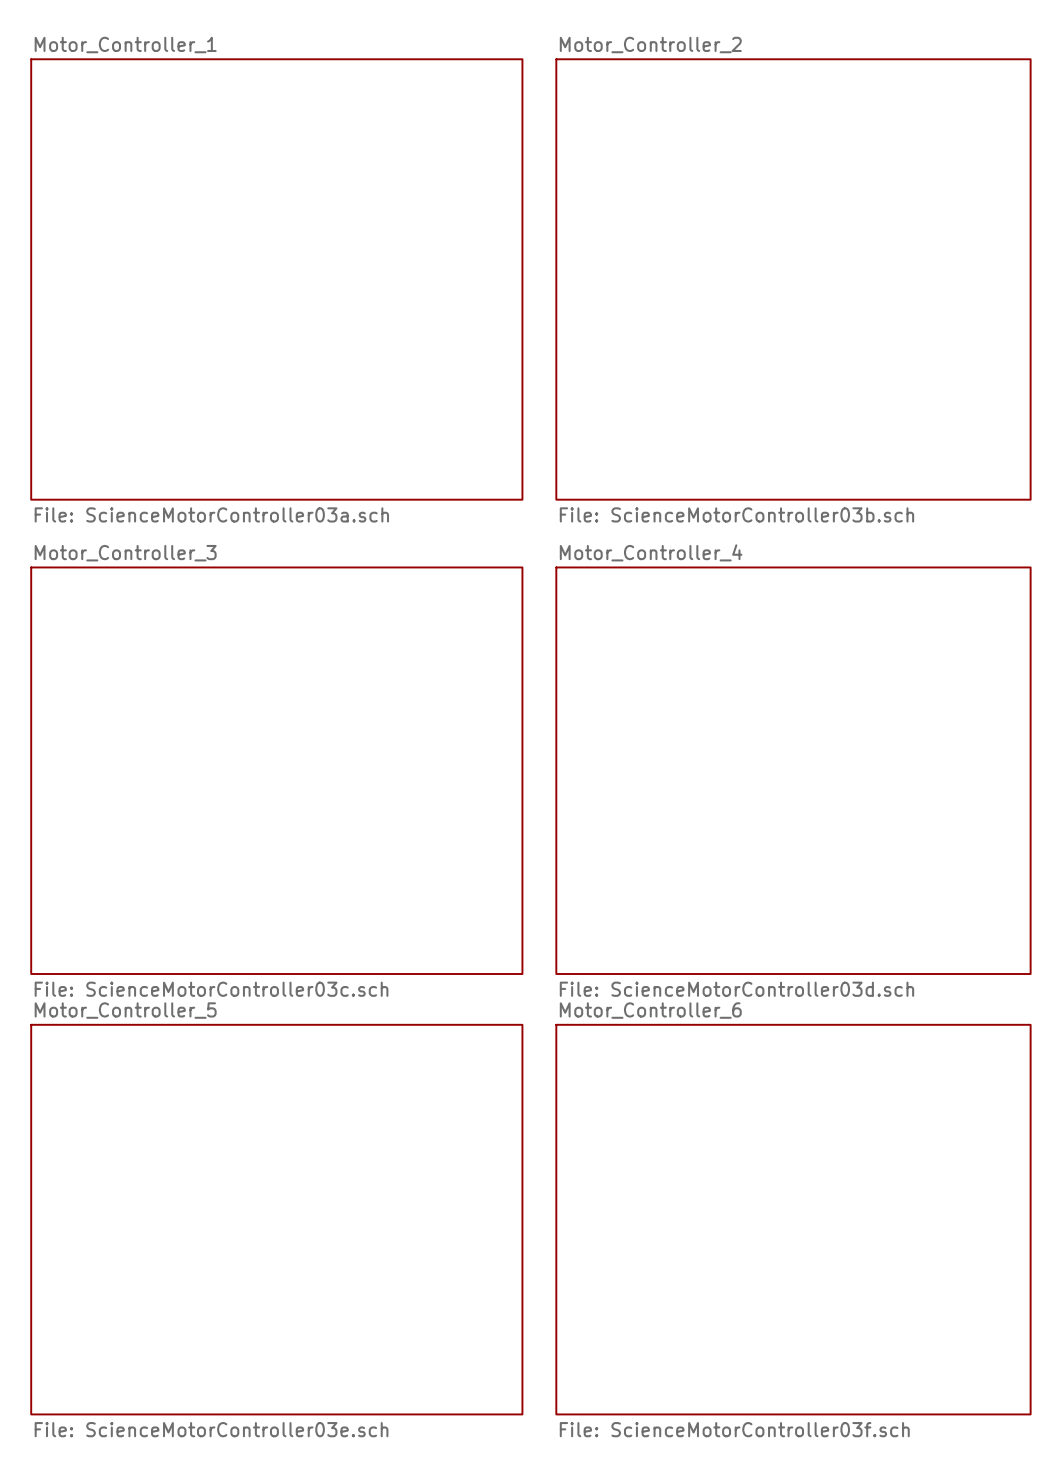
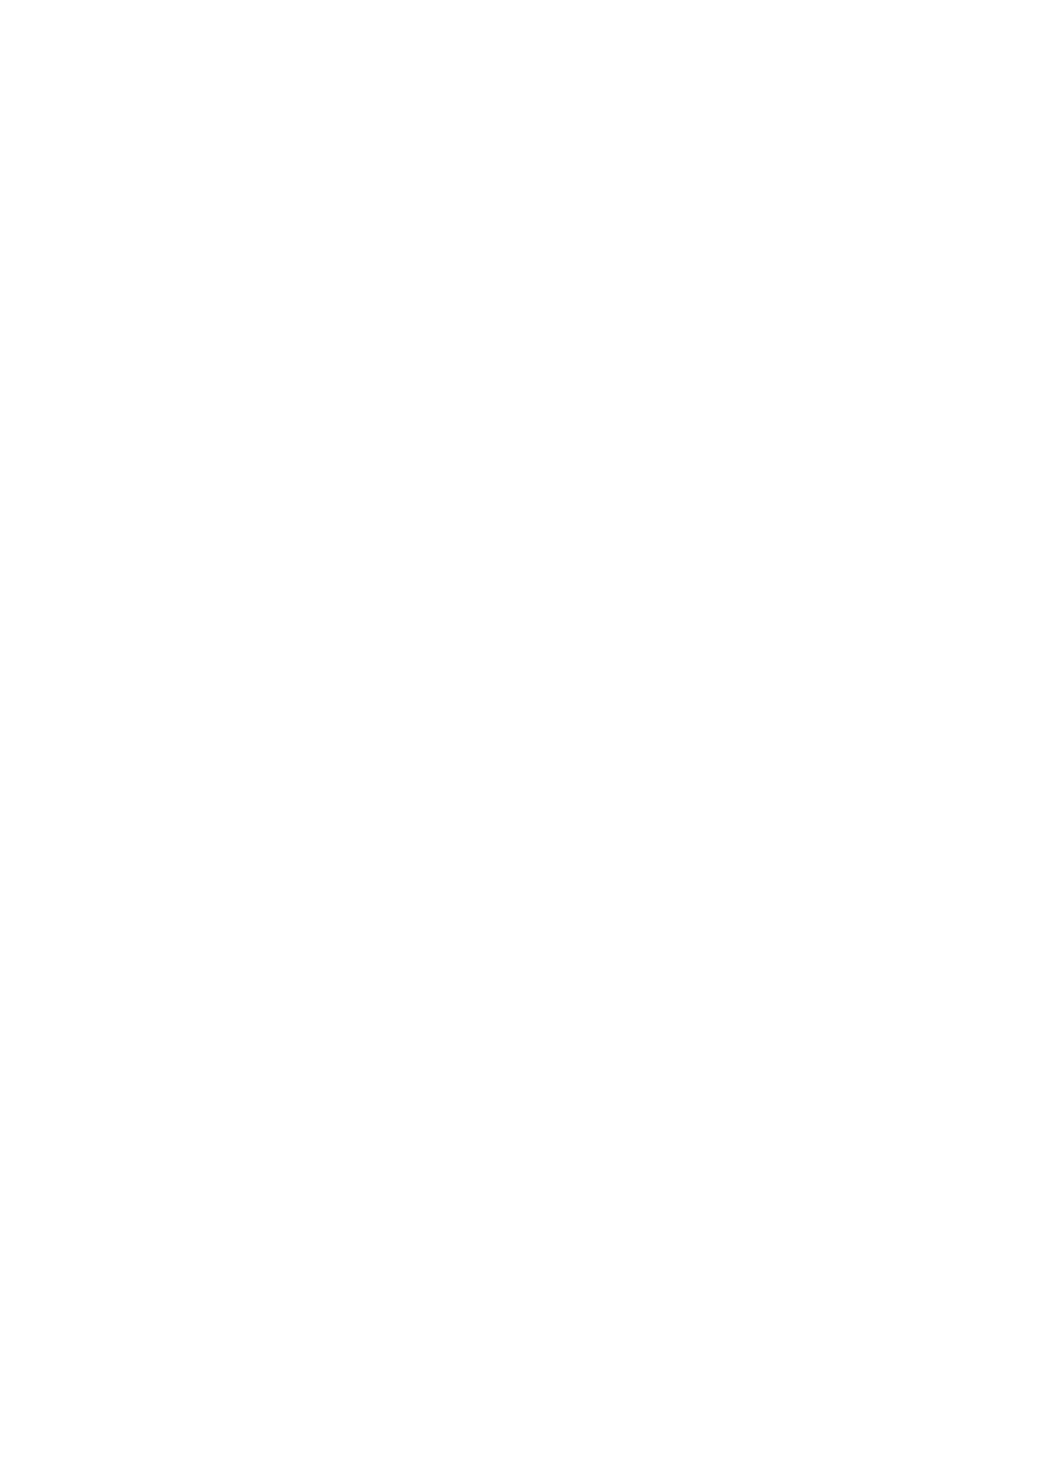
sheet Motor_Controller_1: File: ScienceMotorController03a.sch (276, 279) -> none
sheet Motor_Controller_2: File: ScienceMotorController03b.sch (793, 279) -> none
sheet Motor_Controller_3: File: ScienceMotorController03c.sch (276, 770) -> none
sheet Motor_Controller_4: File: ScienceMotorController03d.sch (793, 770) -> none
sheet Motor_Controller_5: File: ScienceMotorController03e.sch (276, 1219) -> none
sheet Motor_Controller_6: File: ScienceMotorController03f.sch (793, 1219) -> none

